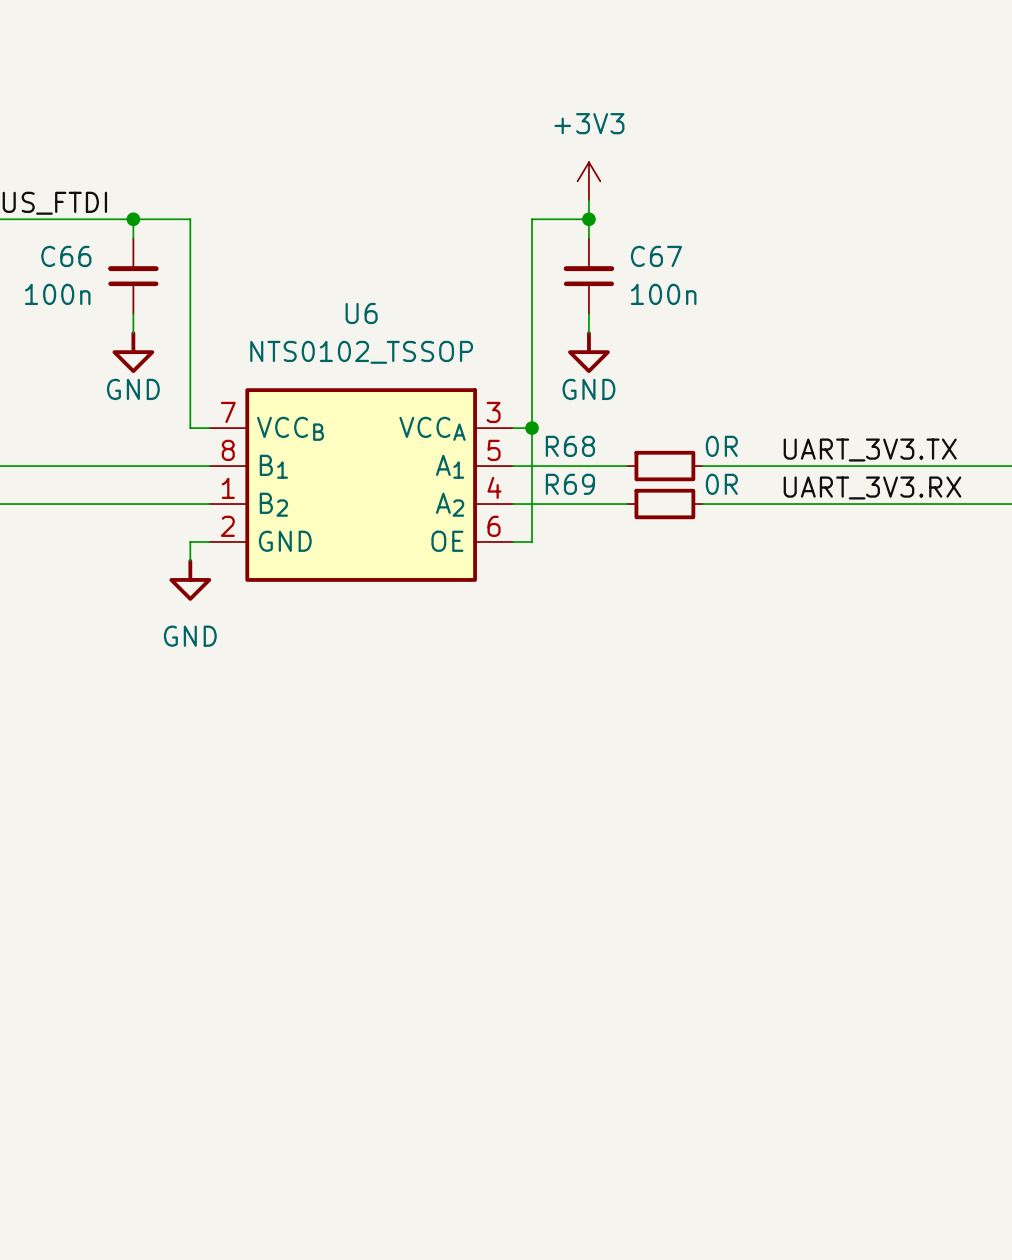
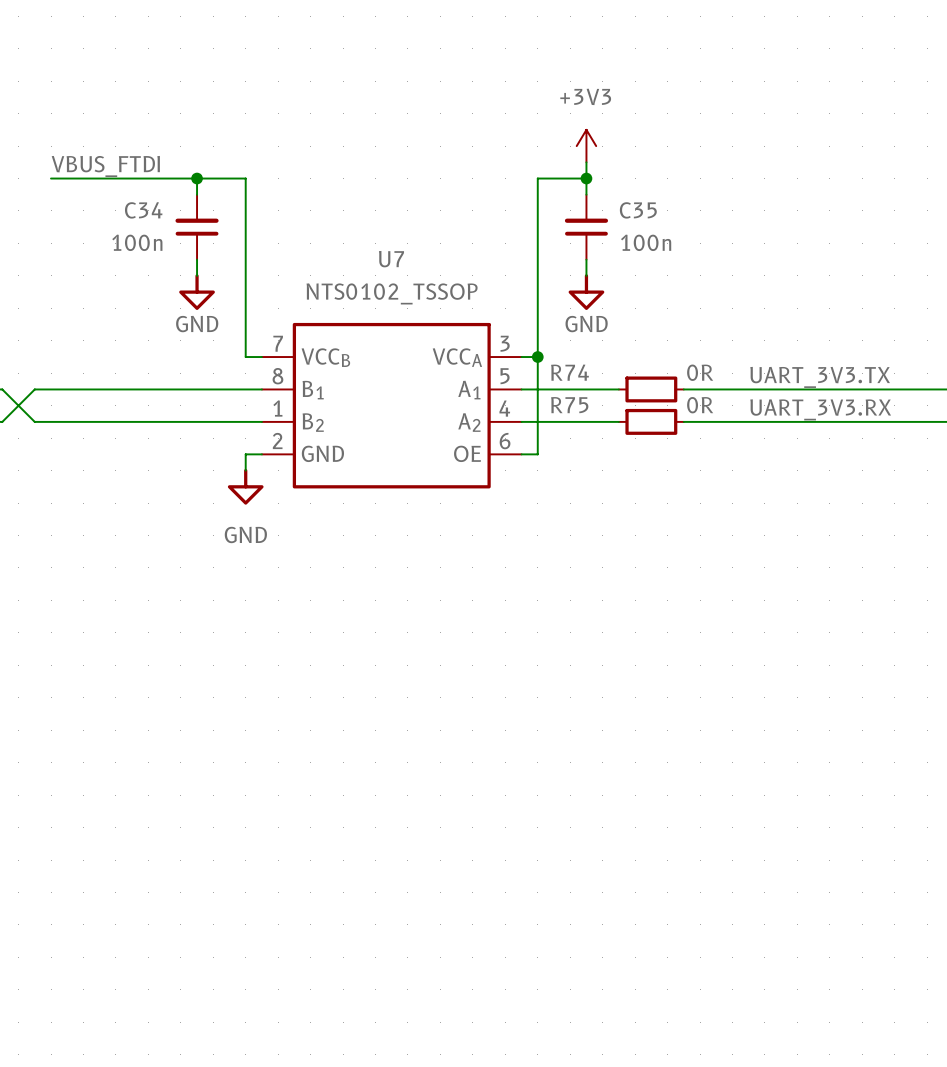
C66 name: C66 (66, 256) -> C34 (143, 210)
C67 name: C67 (656, 256) -> C35 (638, 210)
U6 name: U6 (361, 313) -> U7 (391, 259)
R68 name: R68 (570, 446) -> R74 (569, 372)
R69 name: R69 (570, 484) -> R75 (569, 405)

